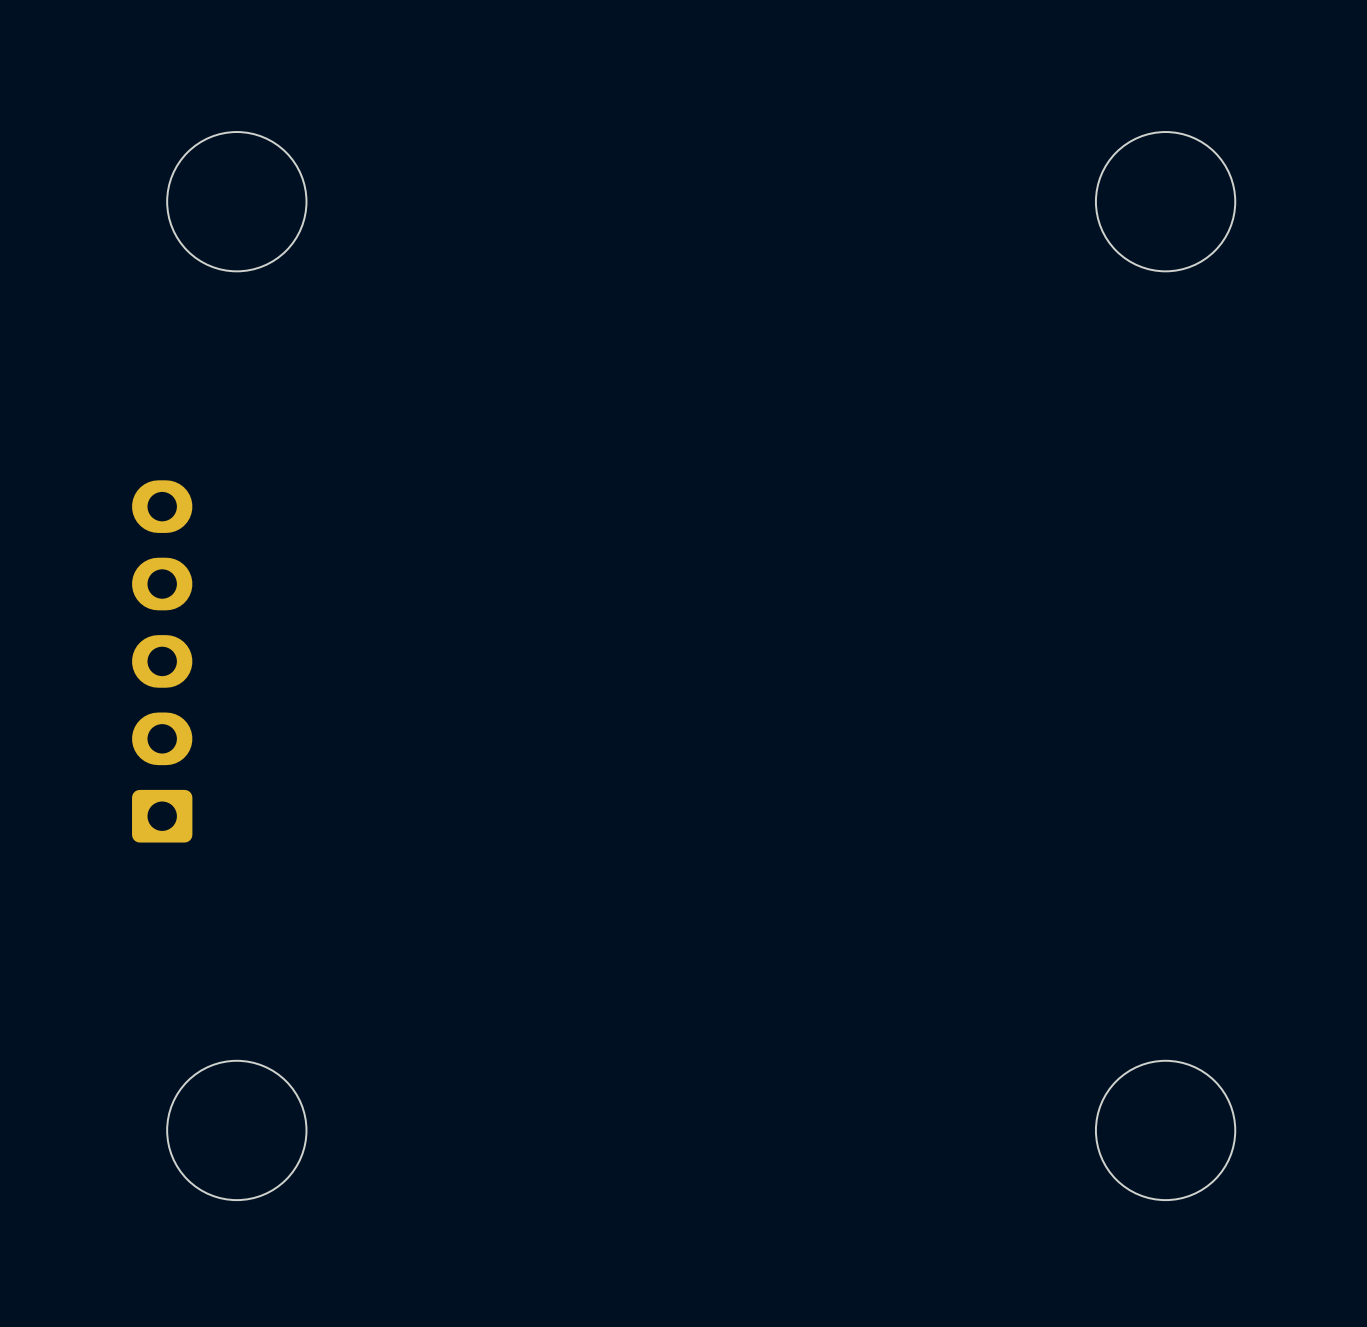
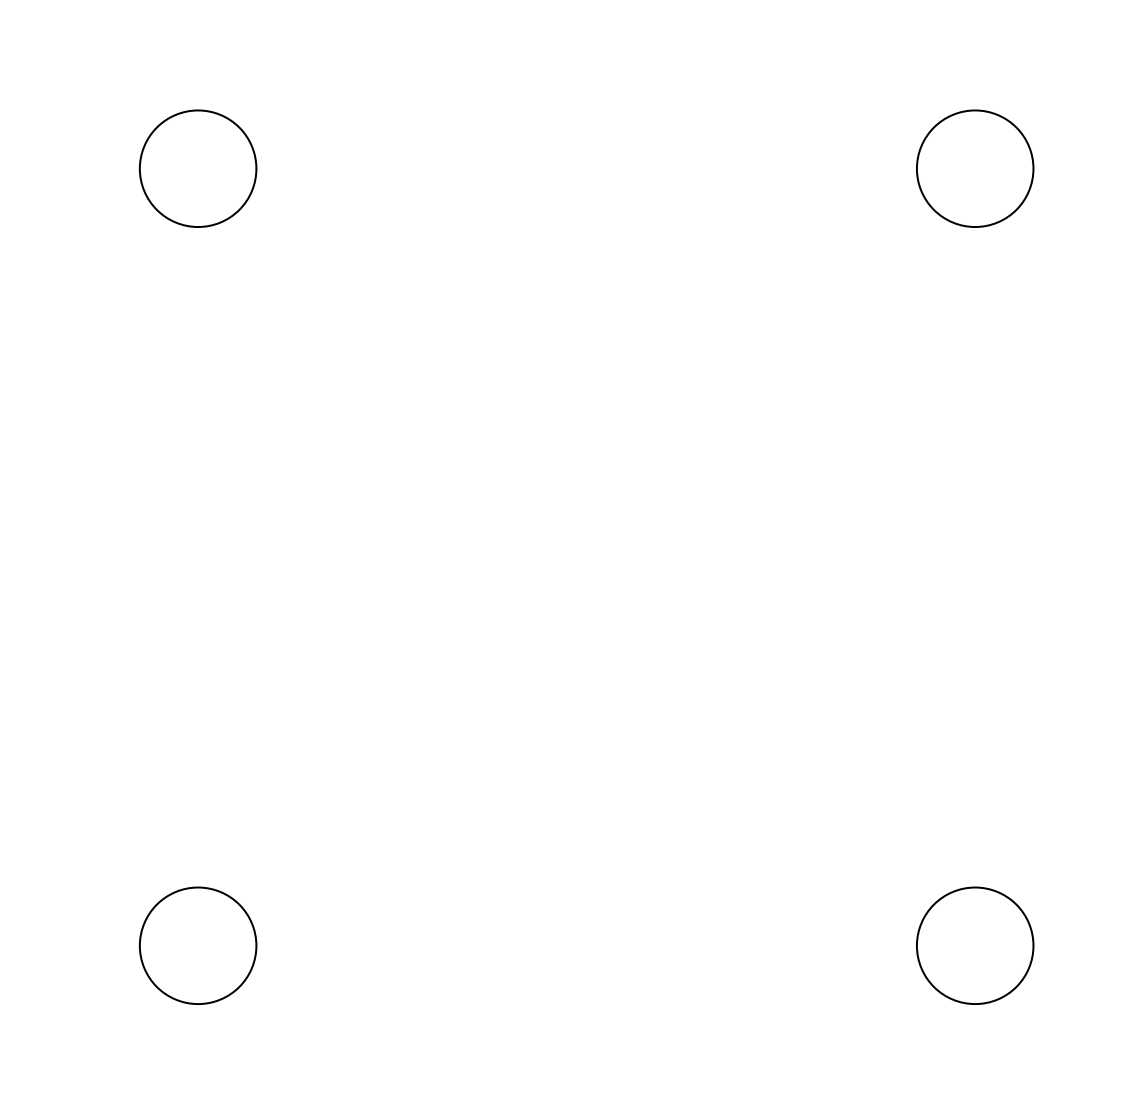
part: (162, 661) -> none

